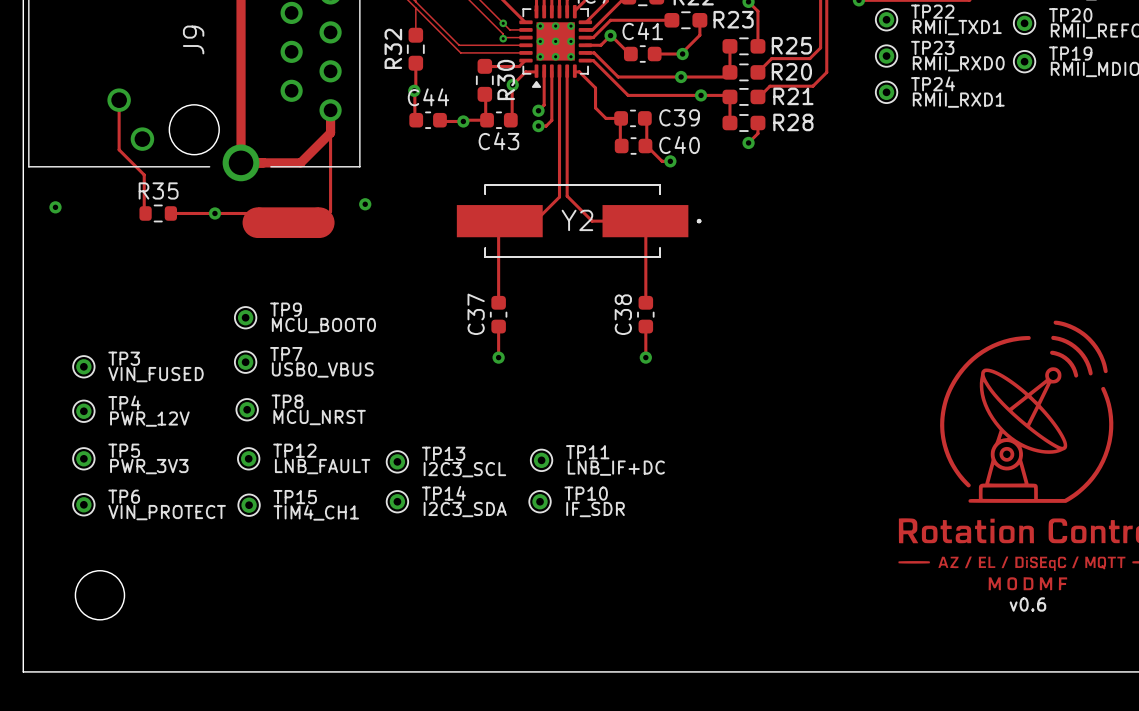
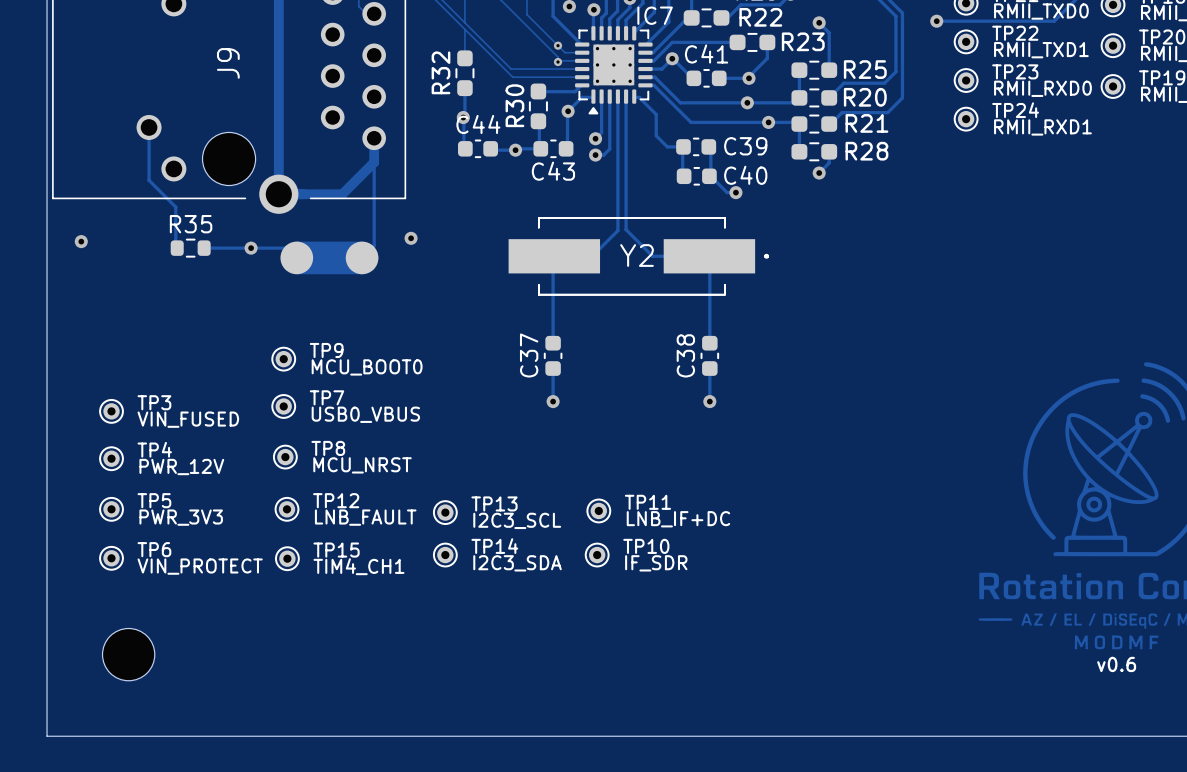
R30 name position: R30 (506, 79) -> R30 (514, 105)

